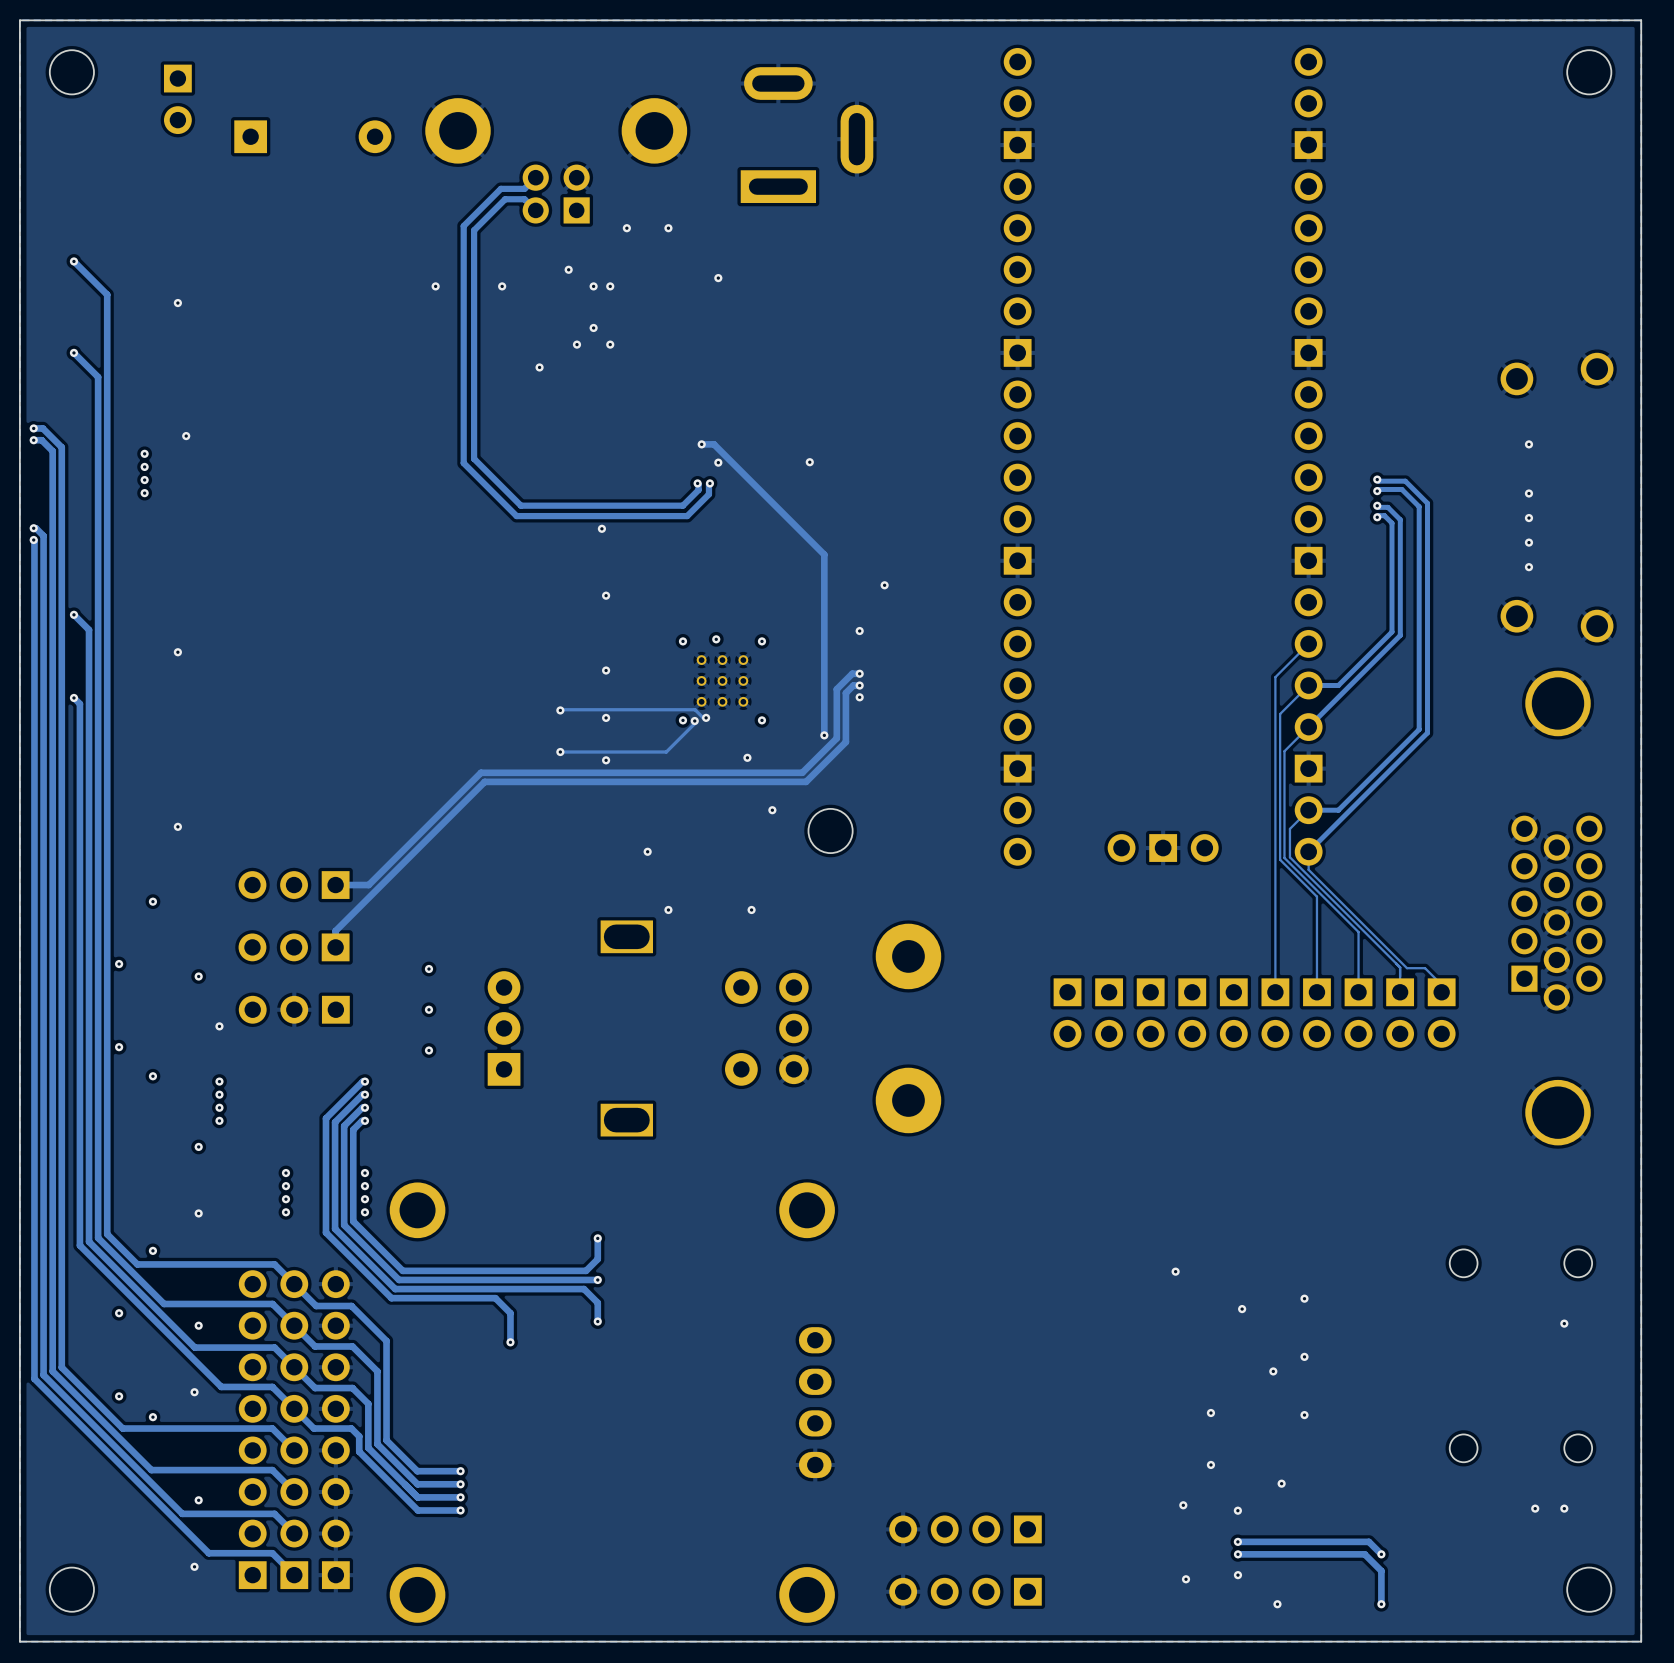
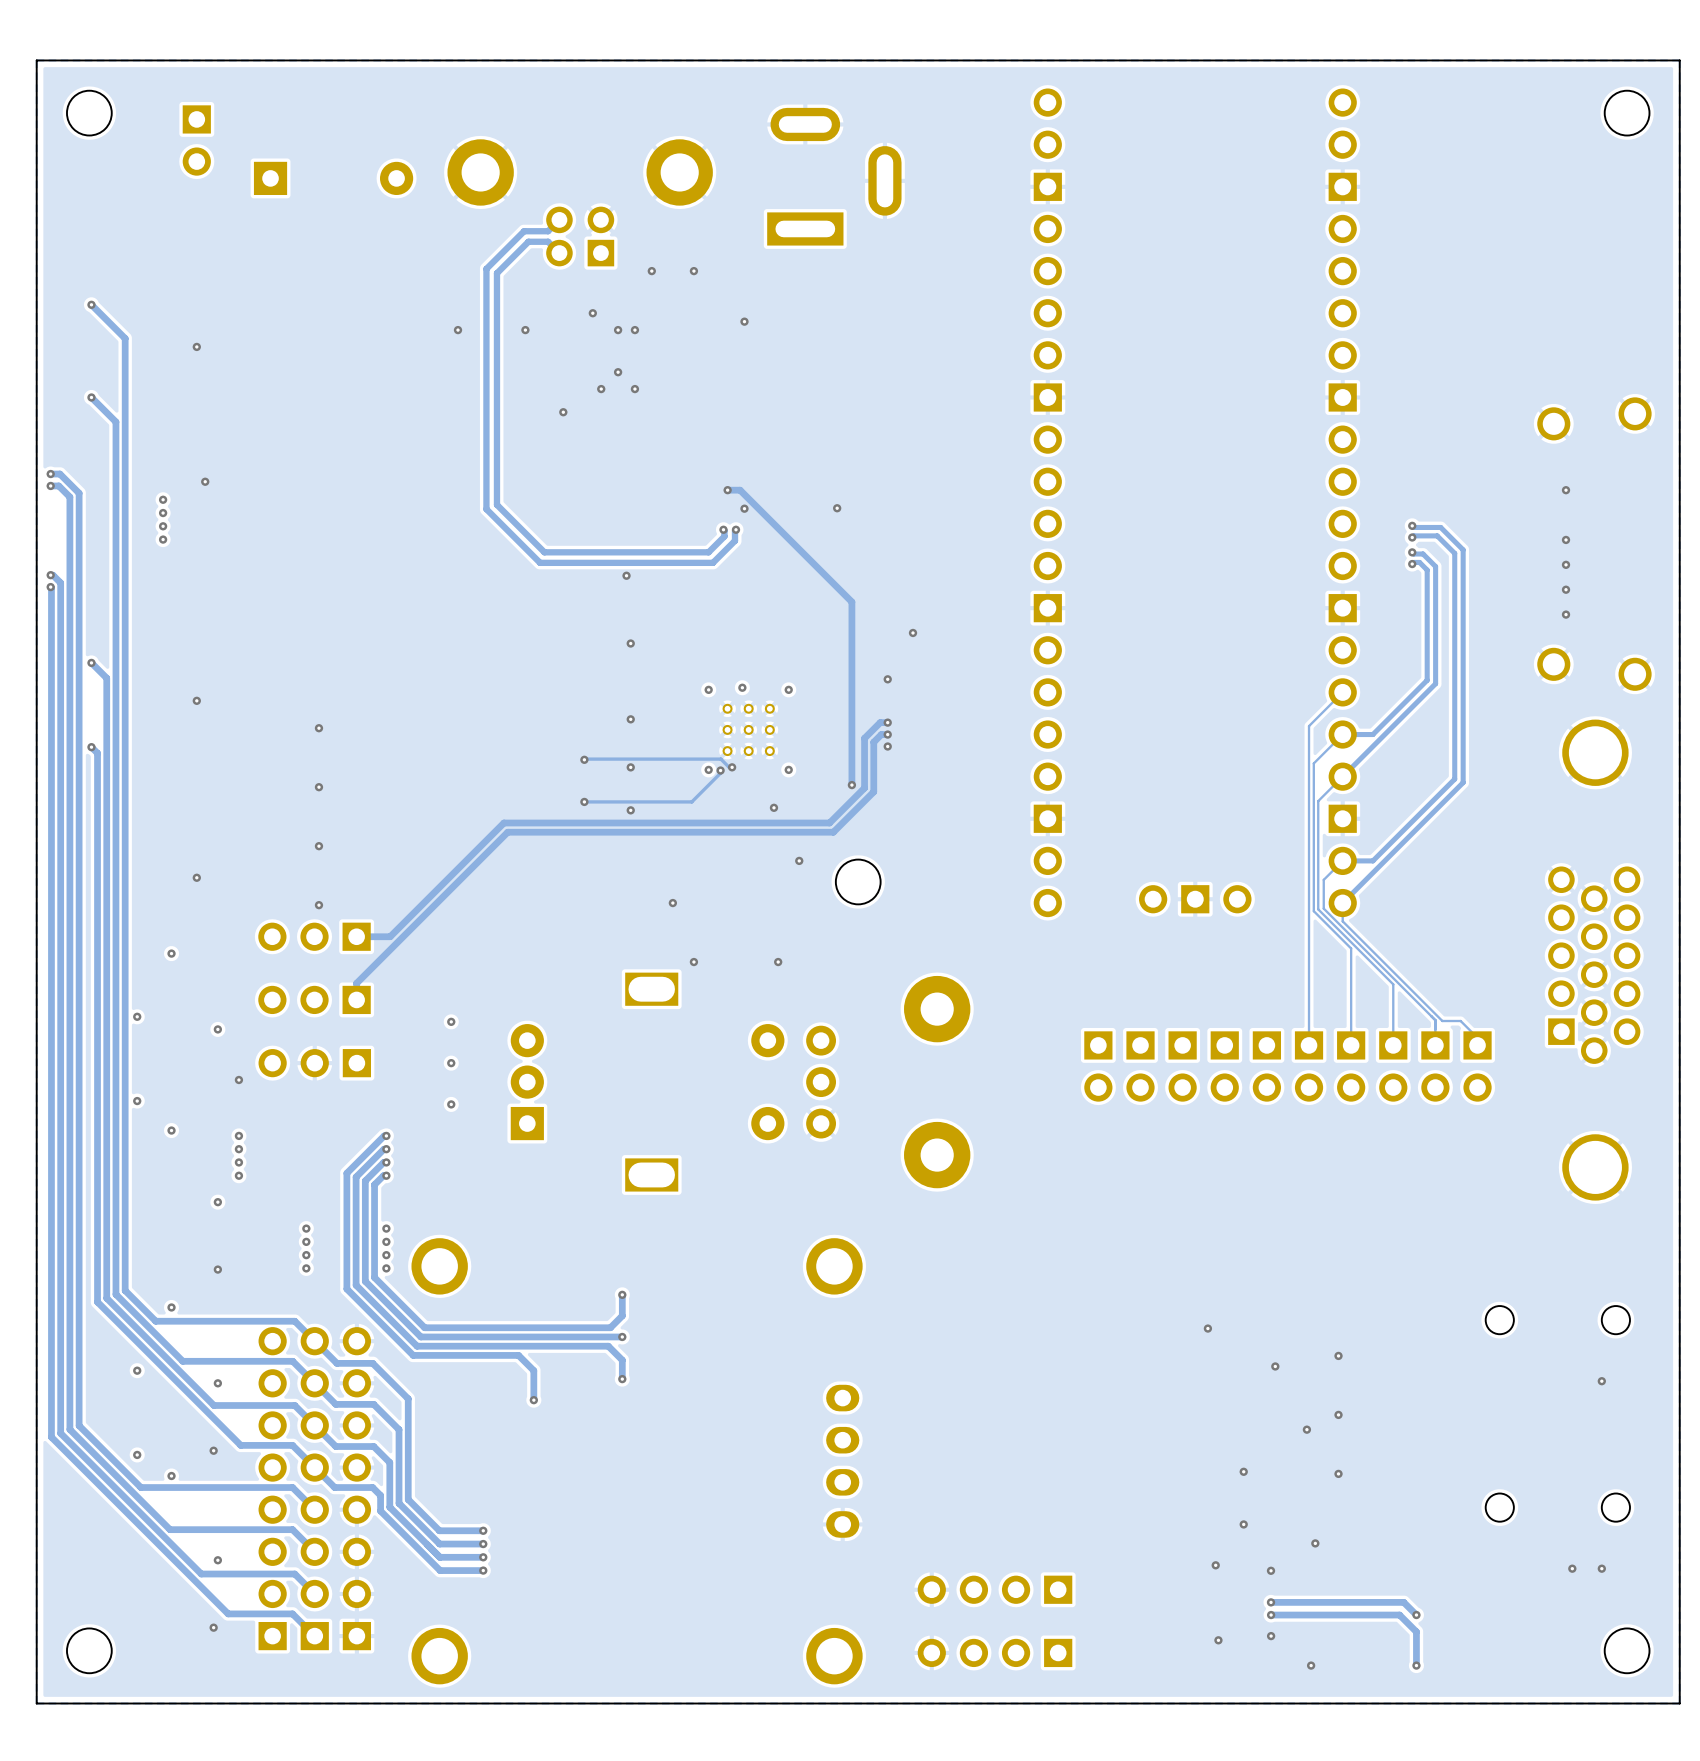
via: none -> (318, 728)
via: none -> (318, 787)
via: none -> (318, 846)
via: none -> (318, 905)

